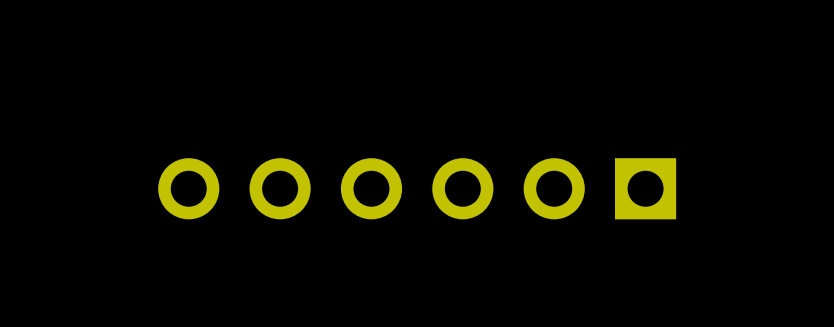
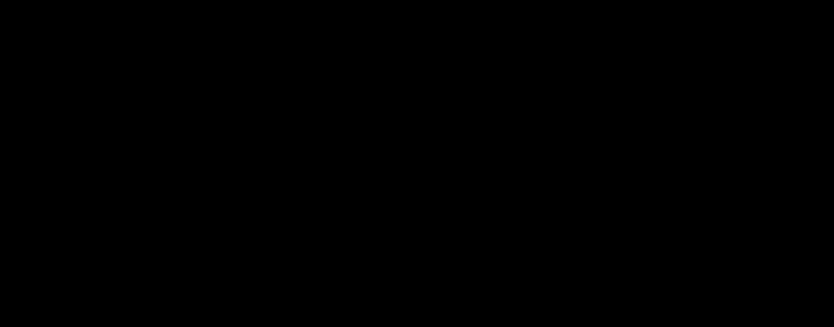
part: (417, 188) -> none

